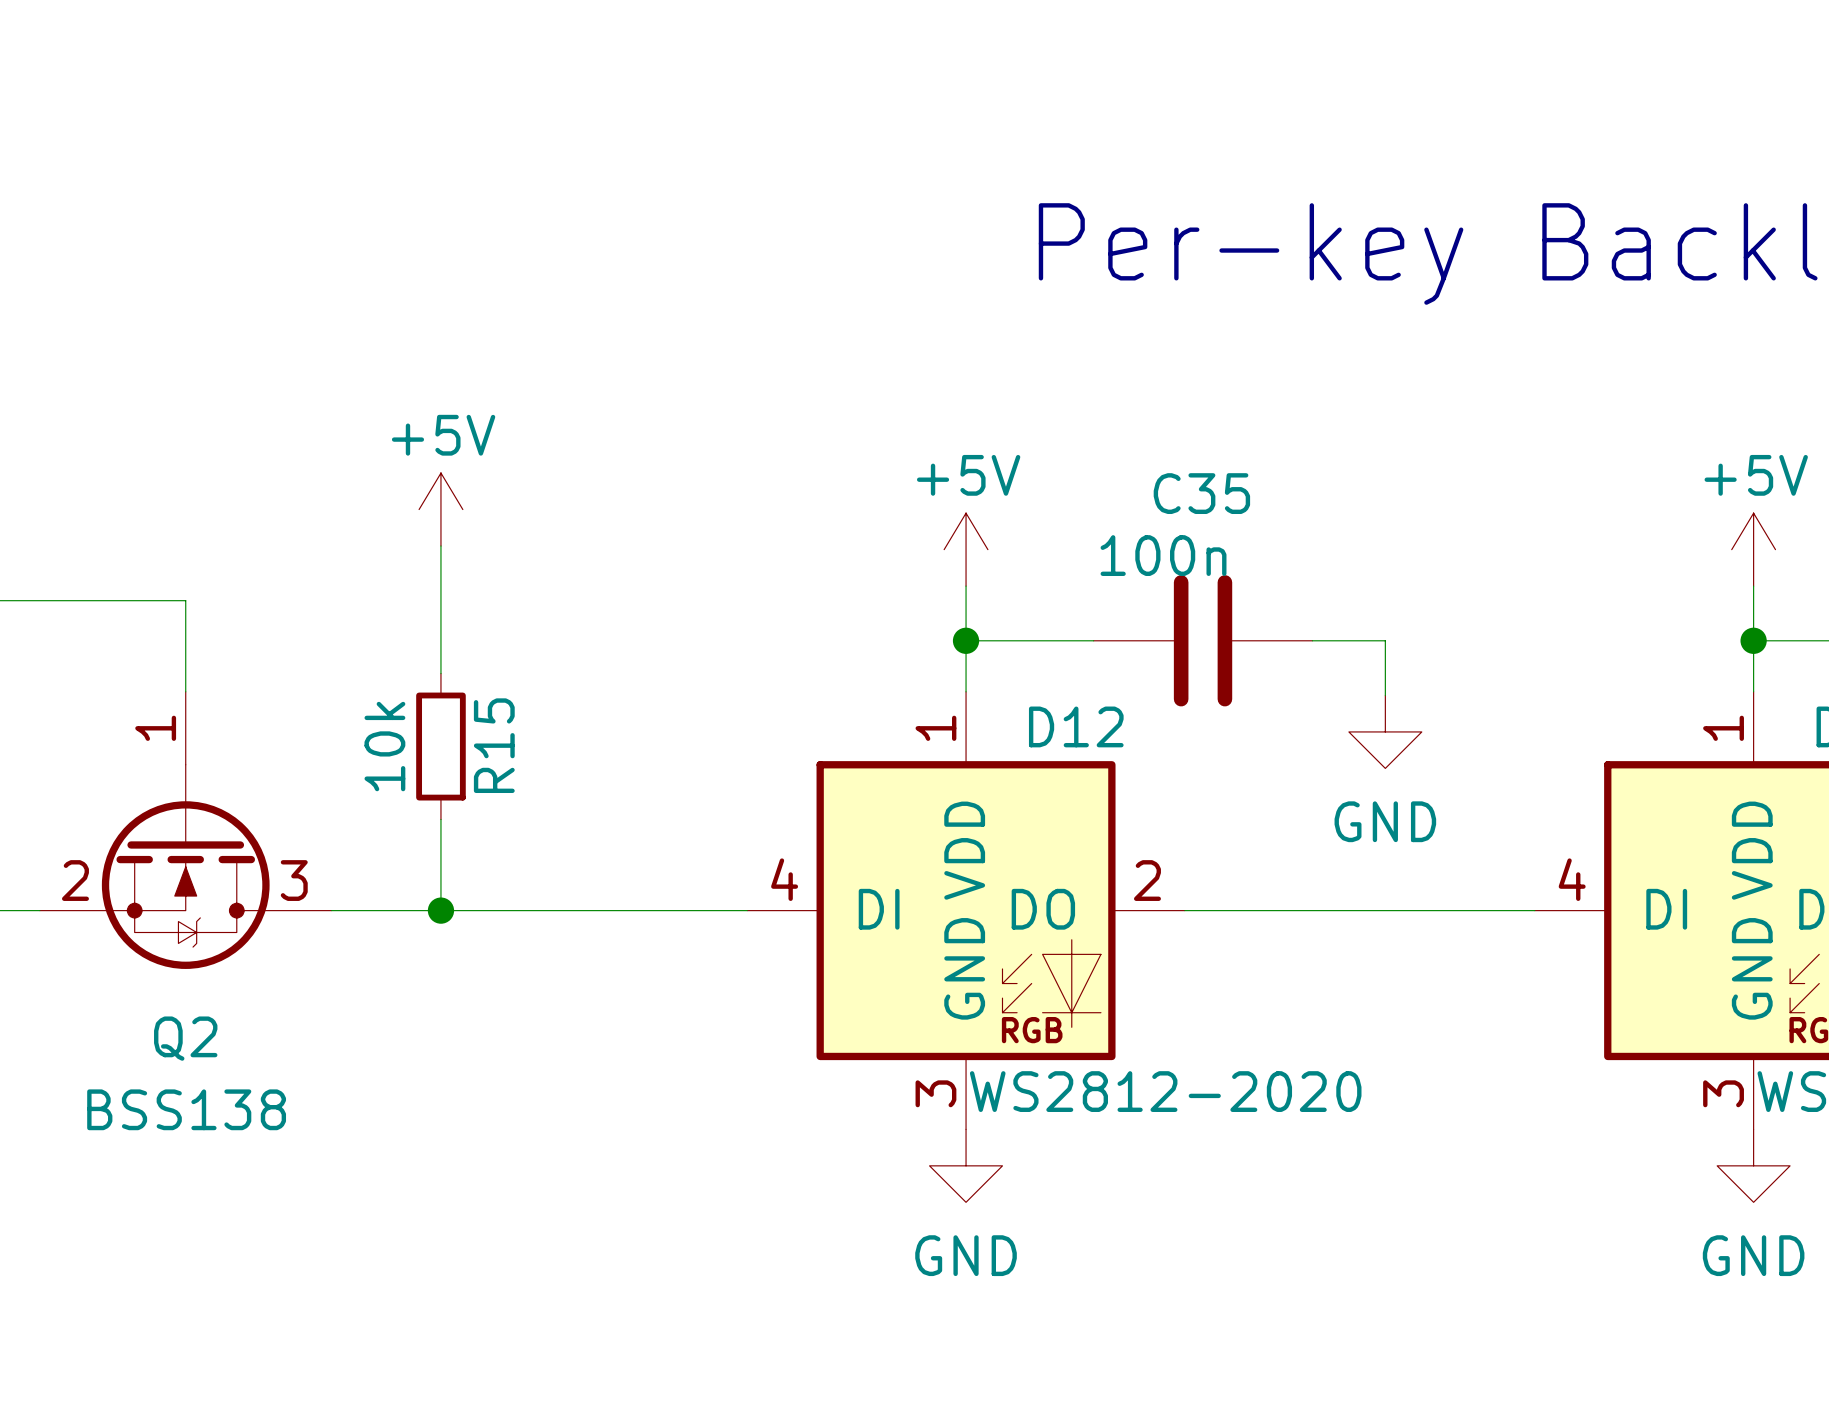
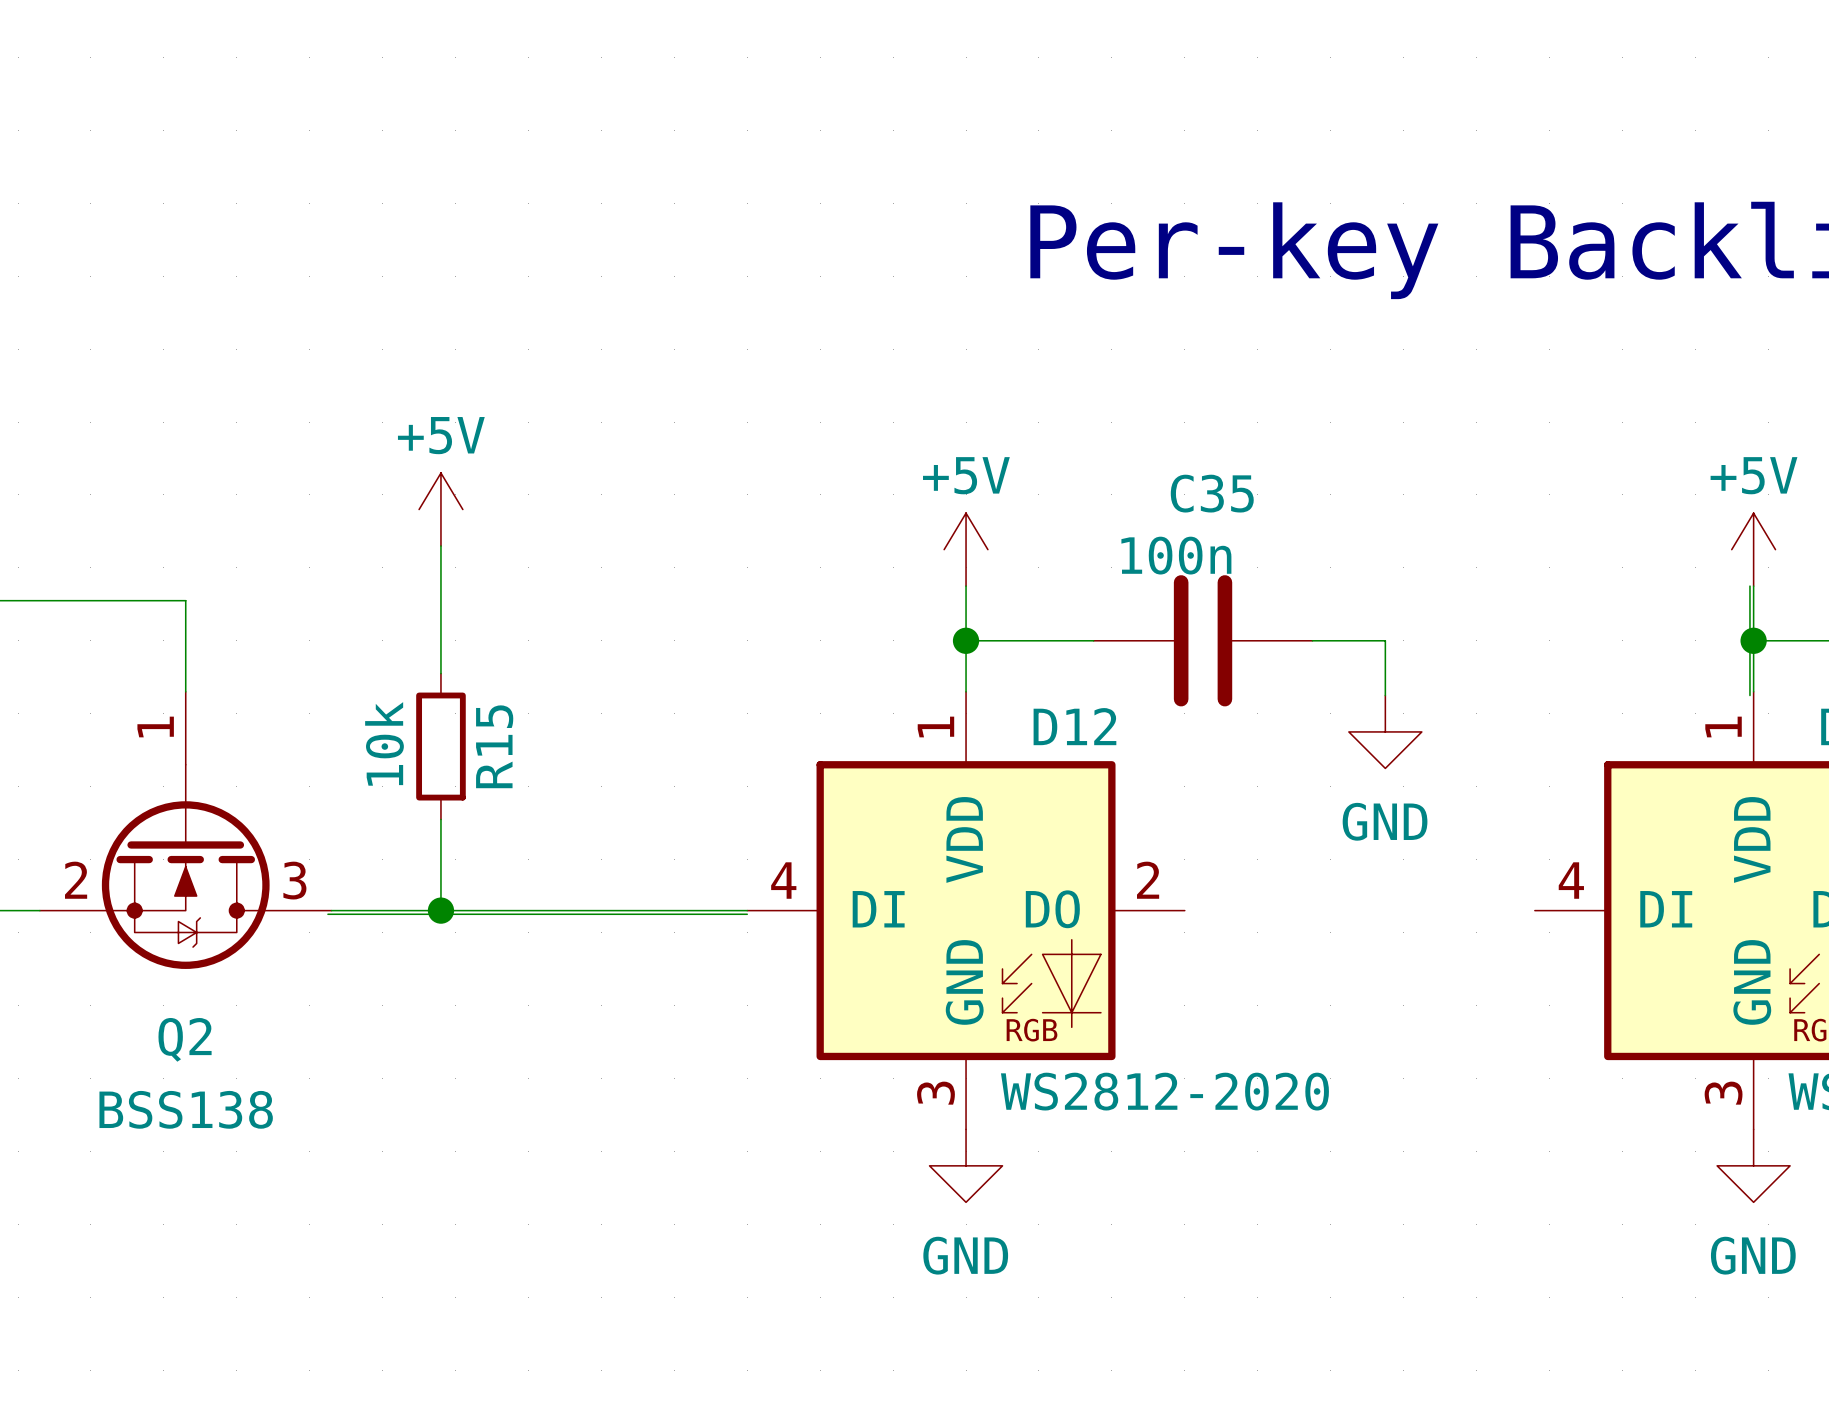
wire: none -> (1749, 586) (1749, 695)
wire: (1184, 910) (1534, 910) -> none
wire: none -> (327, 914) (747, 914)

